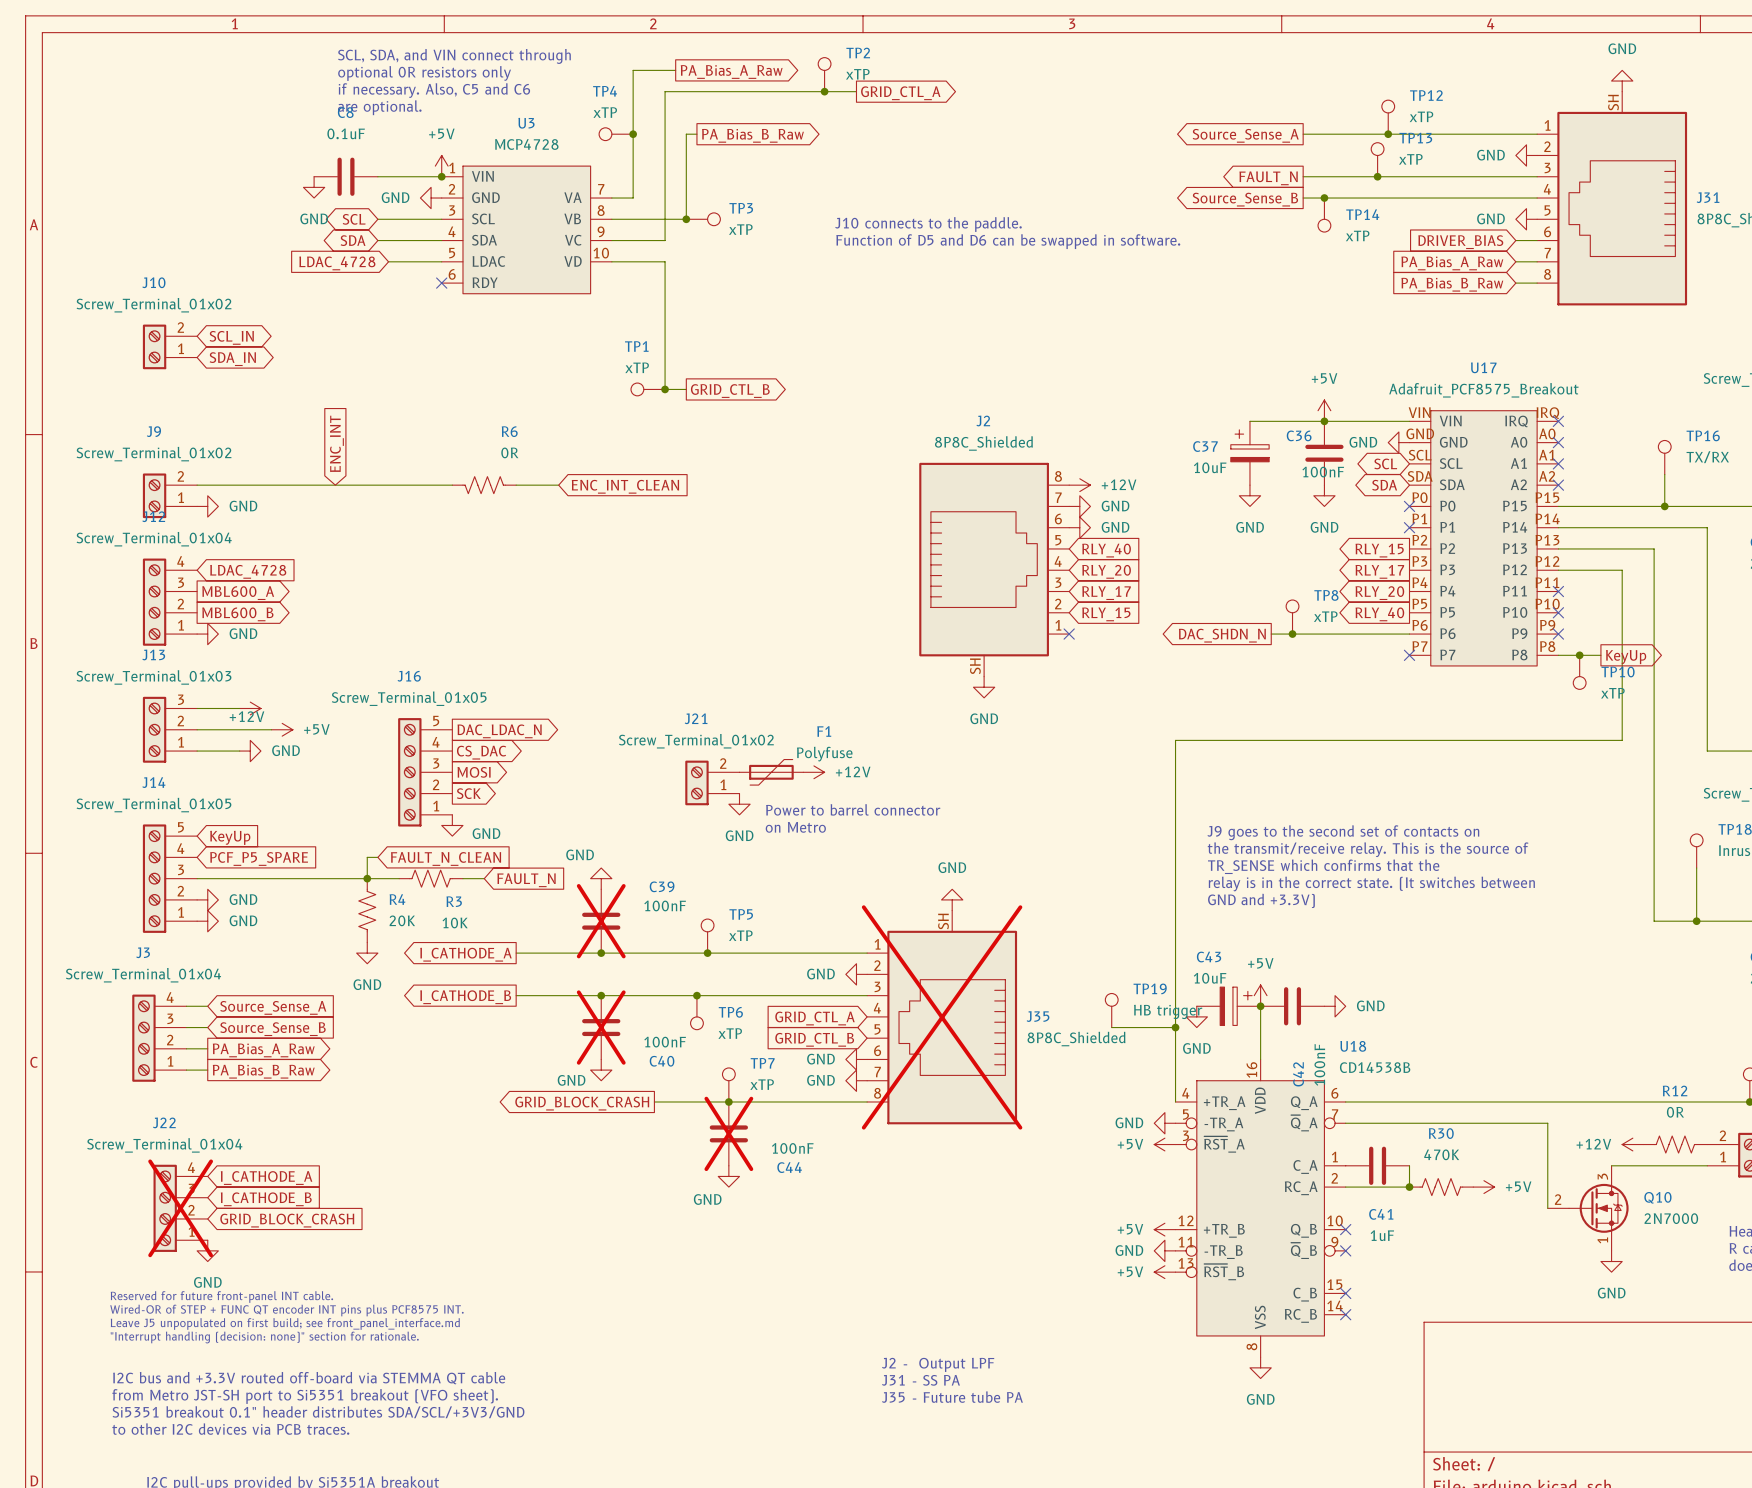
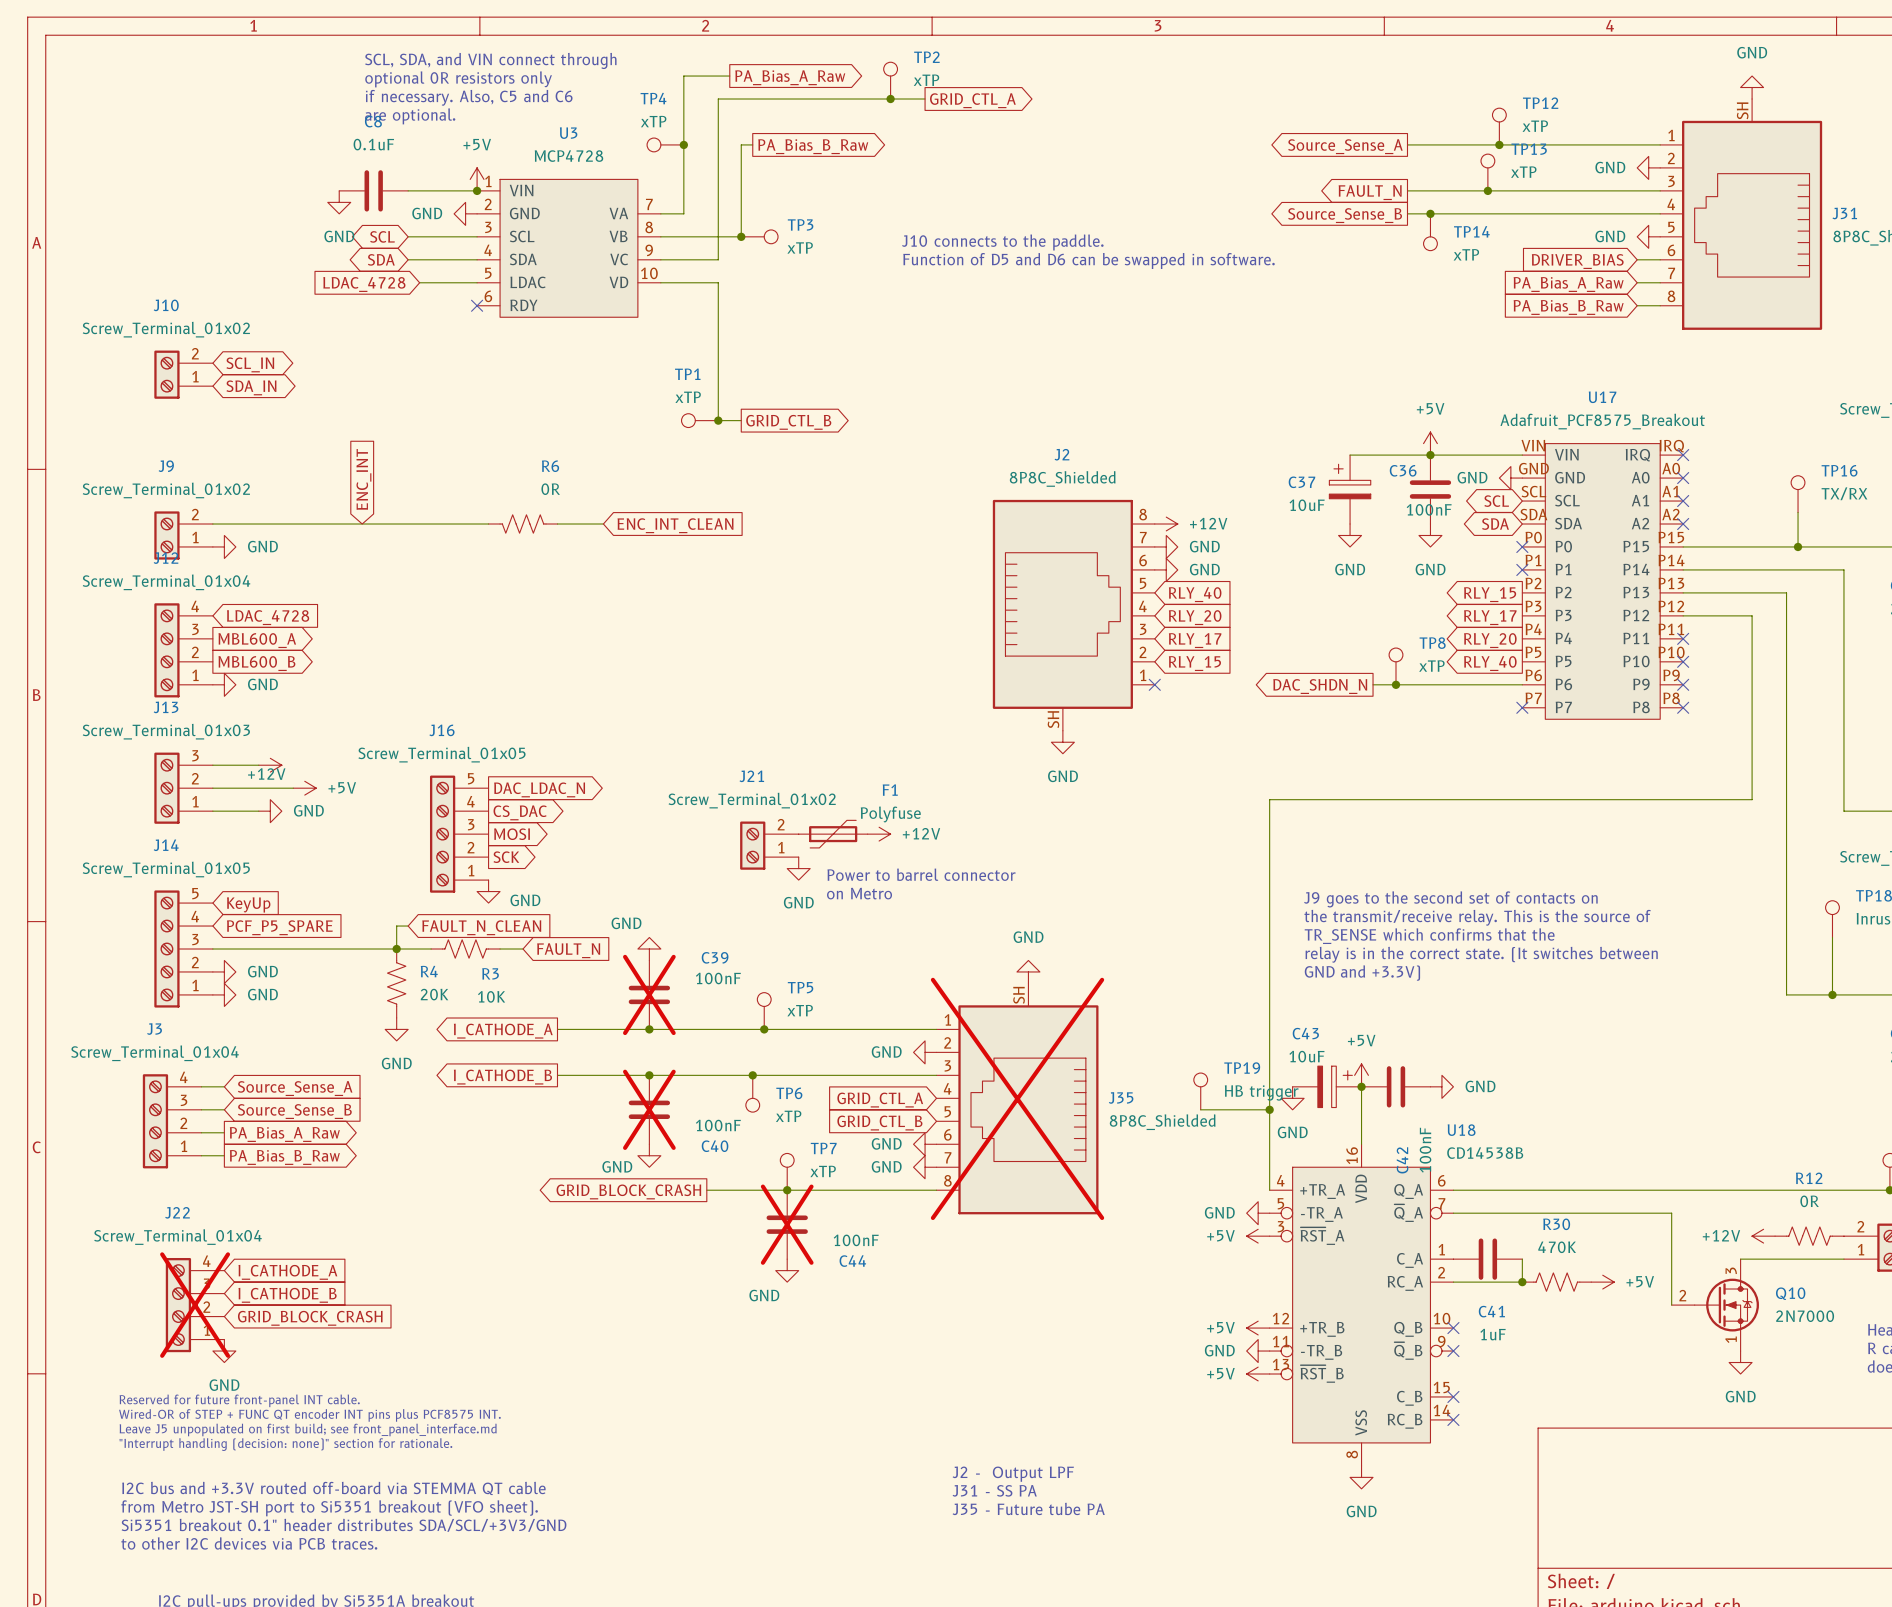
wire: (1558, 655) (1600, 655) -> none
no-connect mark: none -> (1683, 707)
junction: (1579, 655) -> none
global label: KeyUp (1626, 657) -> none
TP10: xTP (1579, 672) -> none

